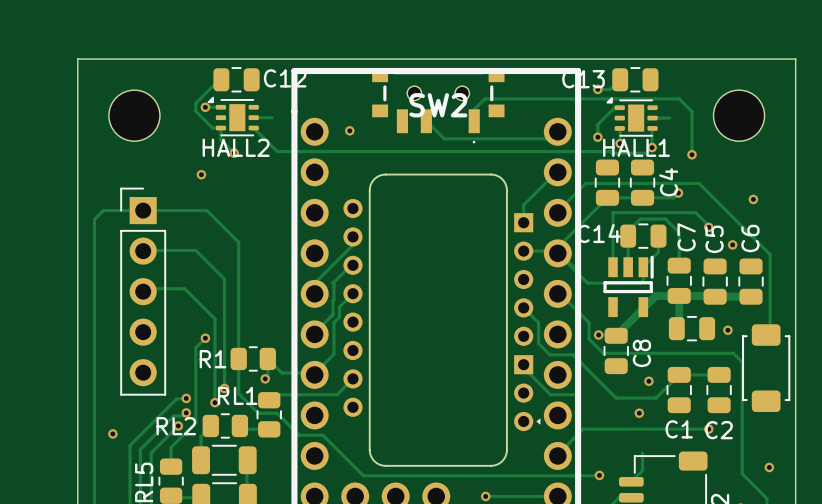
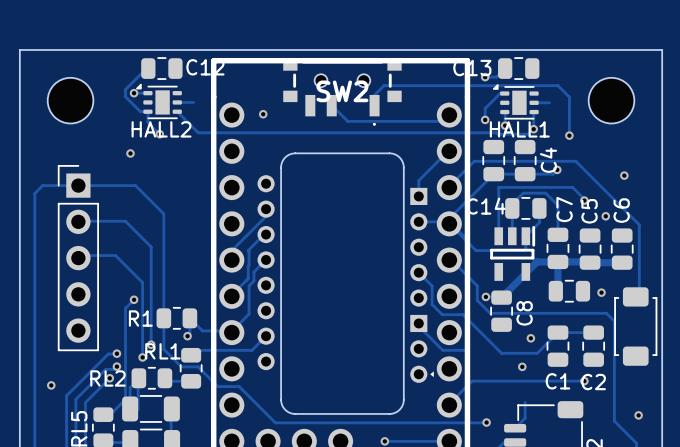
track: (195, 422) (171, 447) (171, 466) -> (125, 375) (125, 399) (111, 413)
track: none -> (138, 379) (138, 409)

